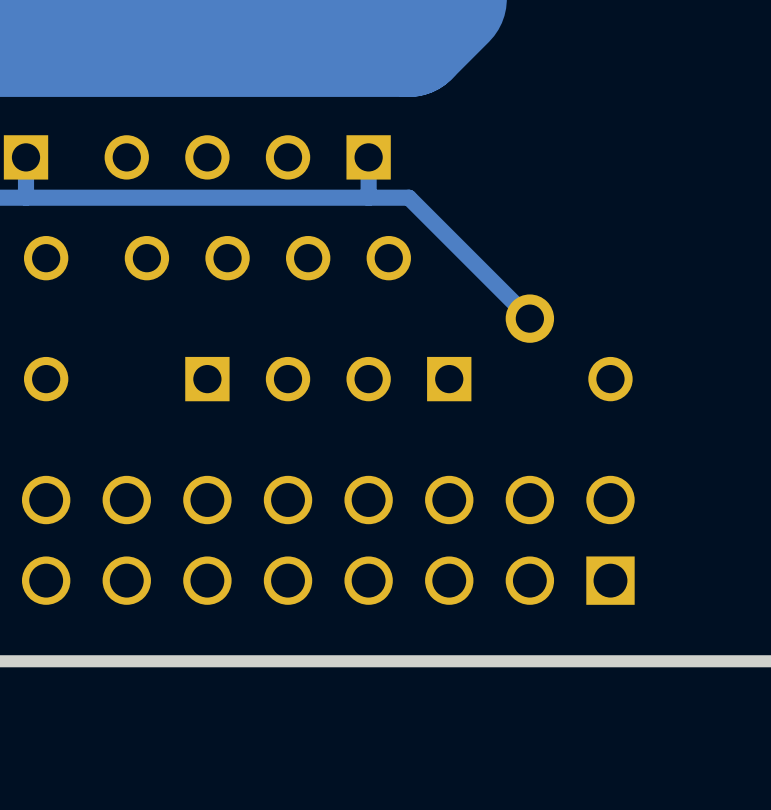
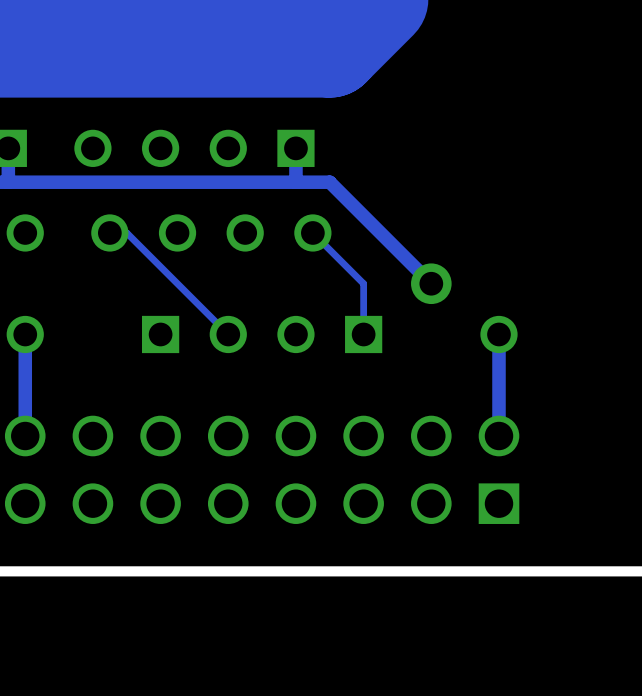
track: none -> (109, 232) (126, 232) (228, 334)
track: none -> (312, 232) (363, 283) (363, 334)
track: none -> (25, 334) (25, 436)
track: none -> (498, 334) (498, 436)

